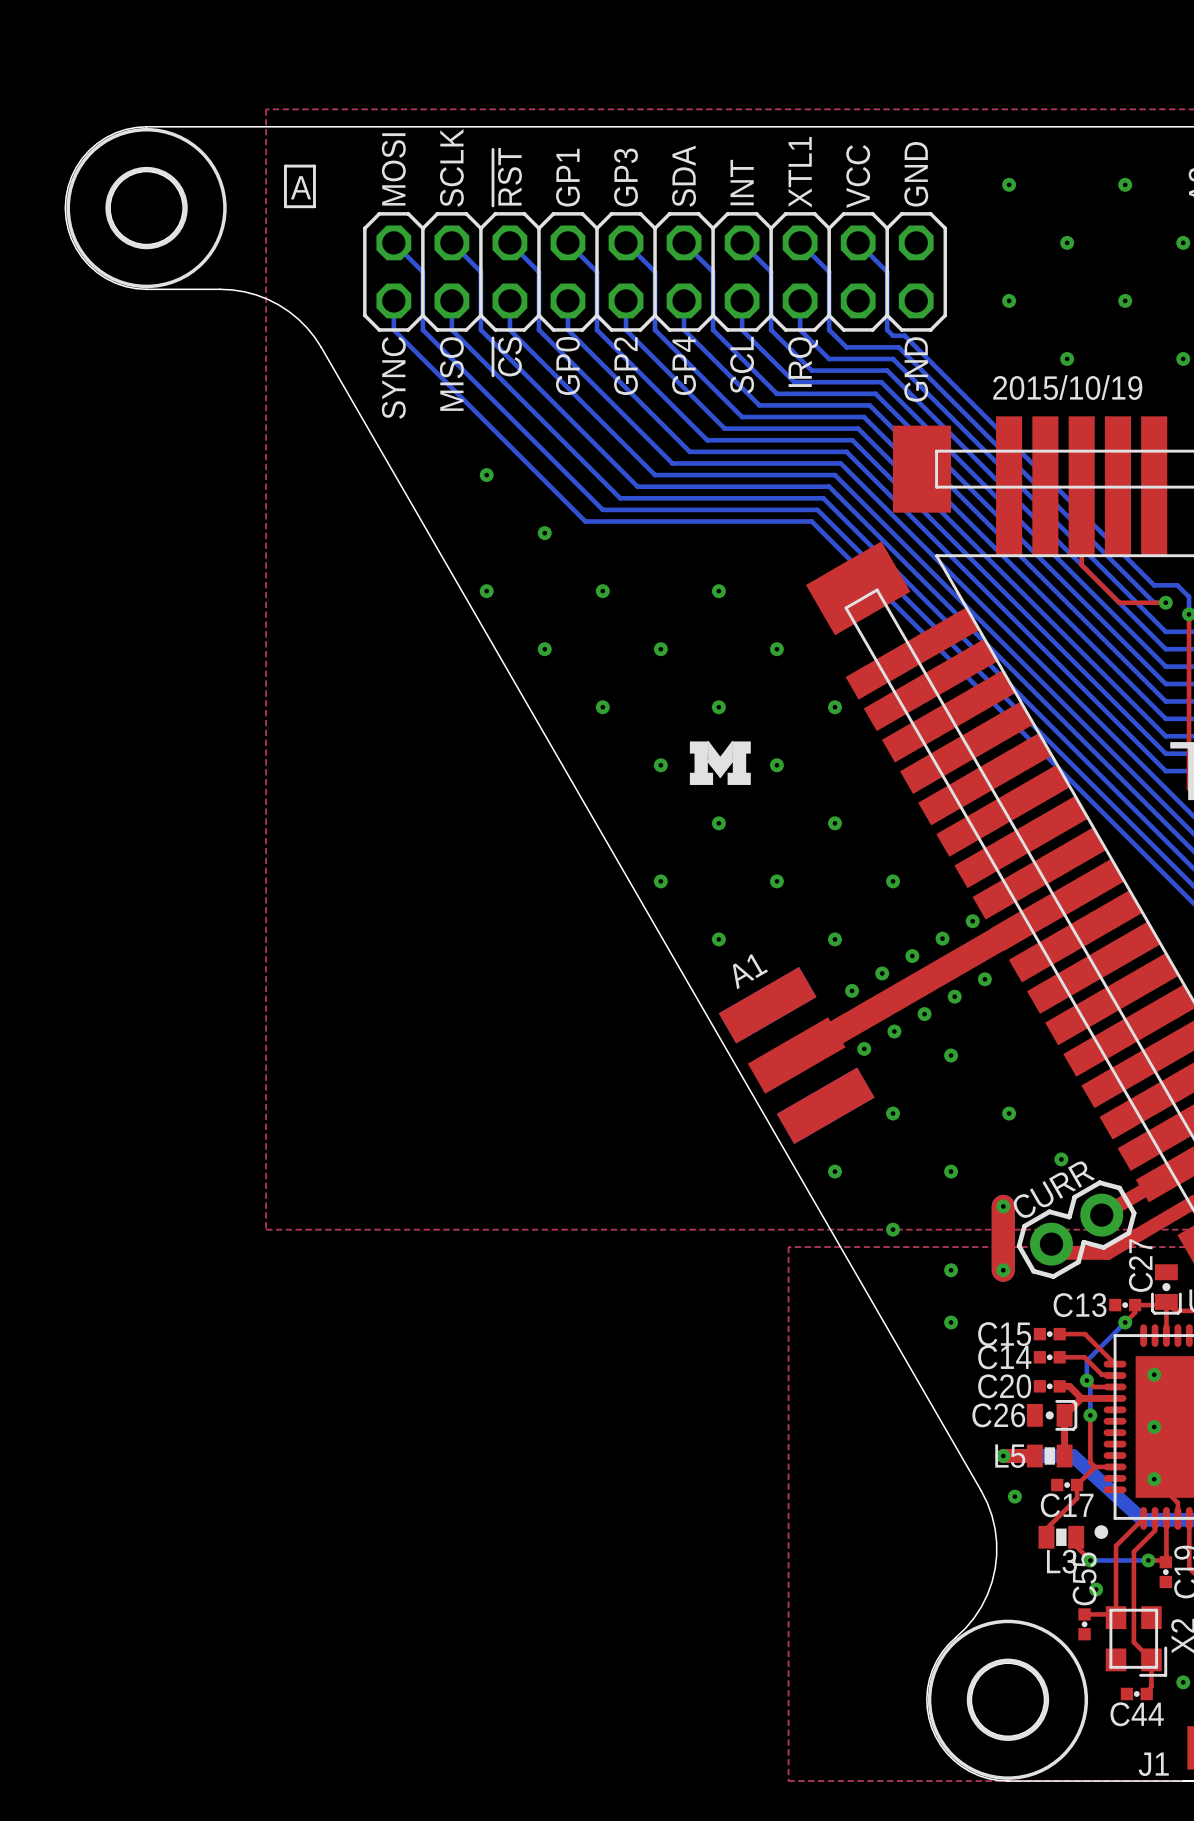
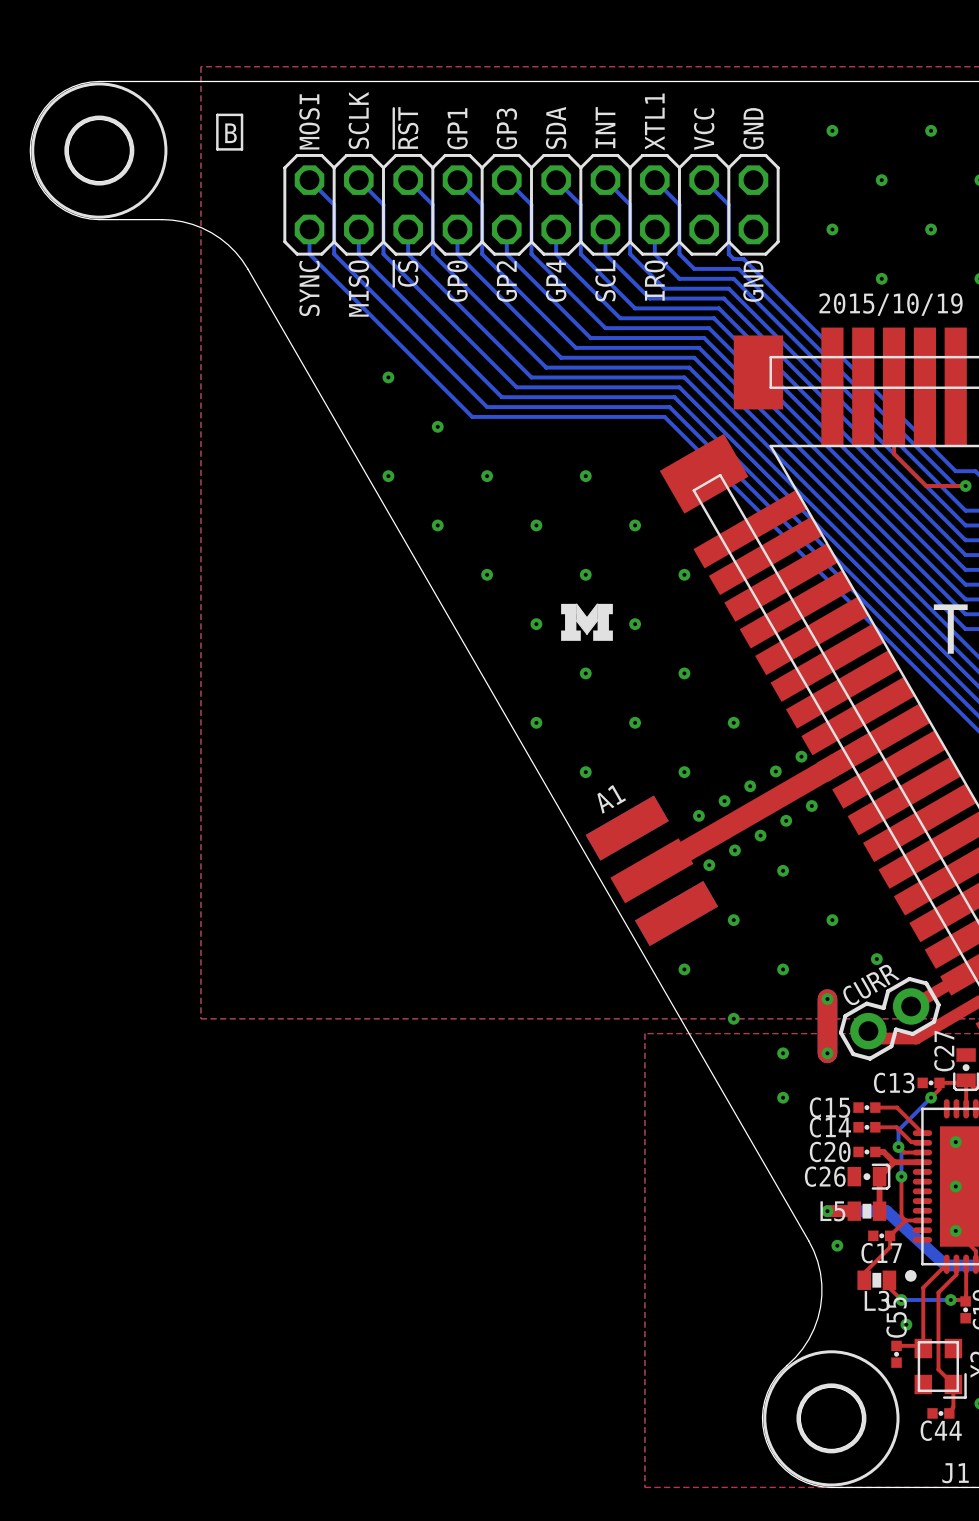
text: A (300, 187) -> B (230, 133)

